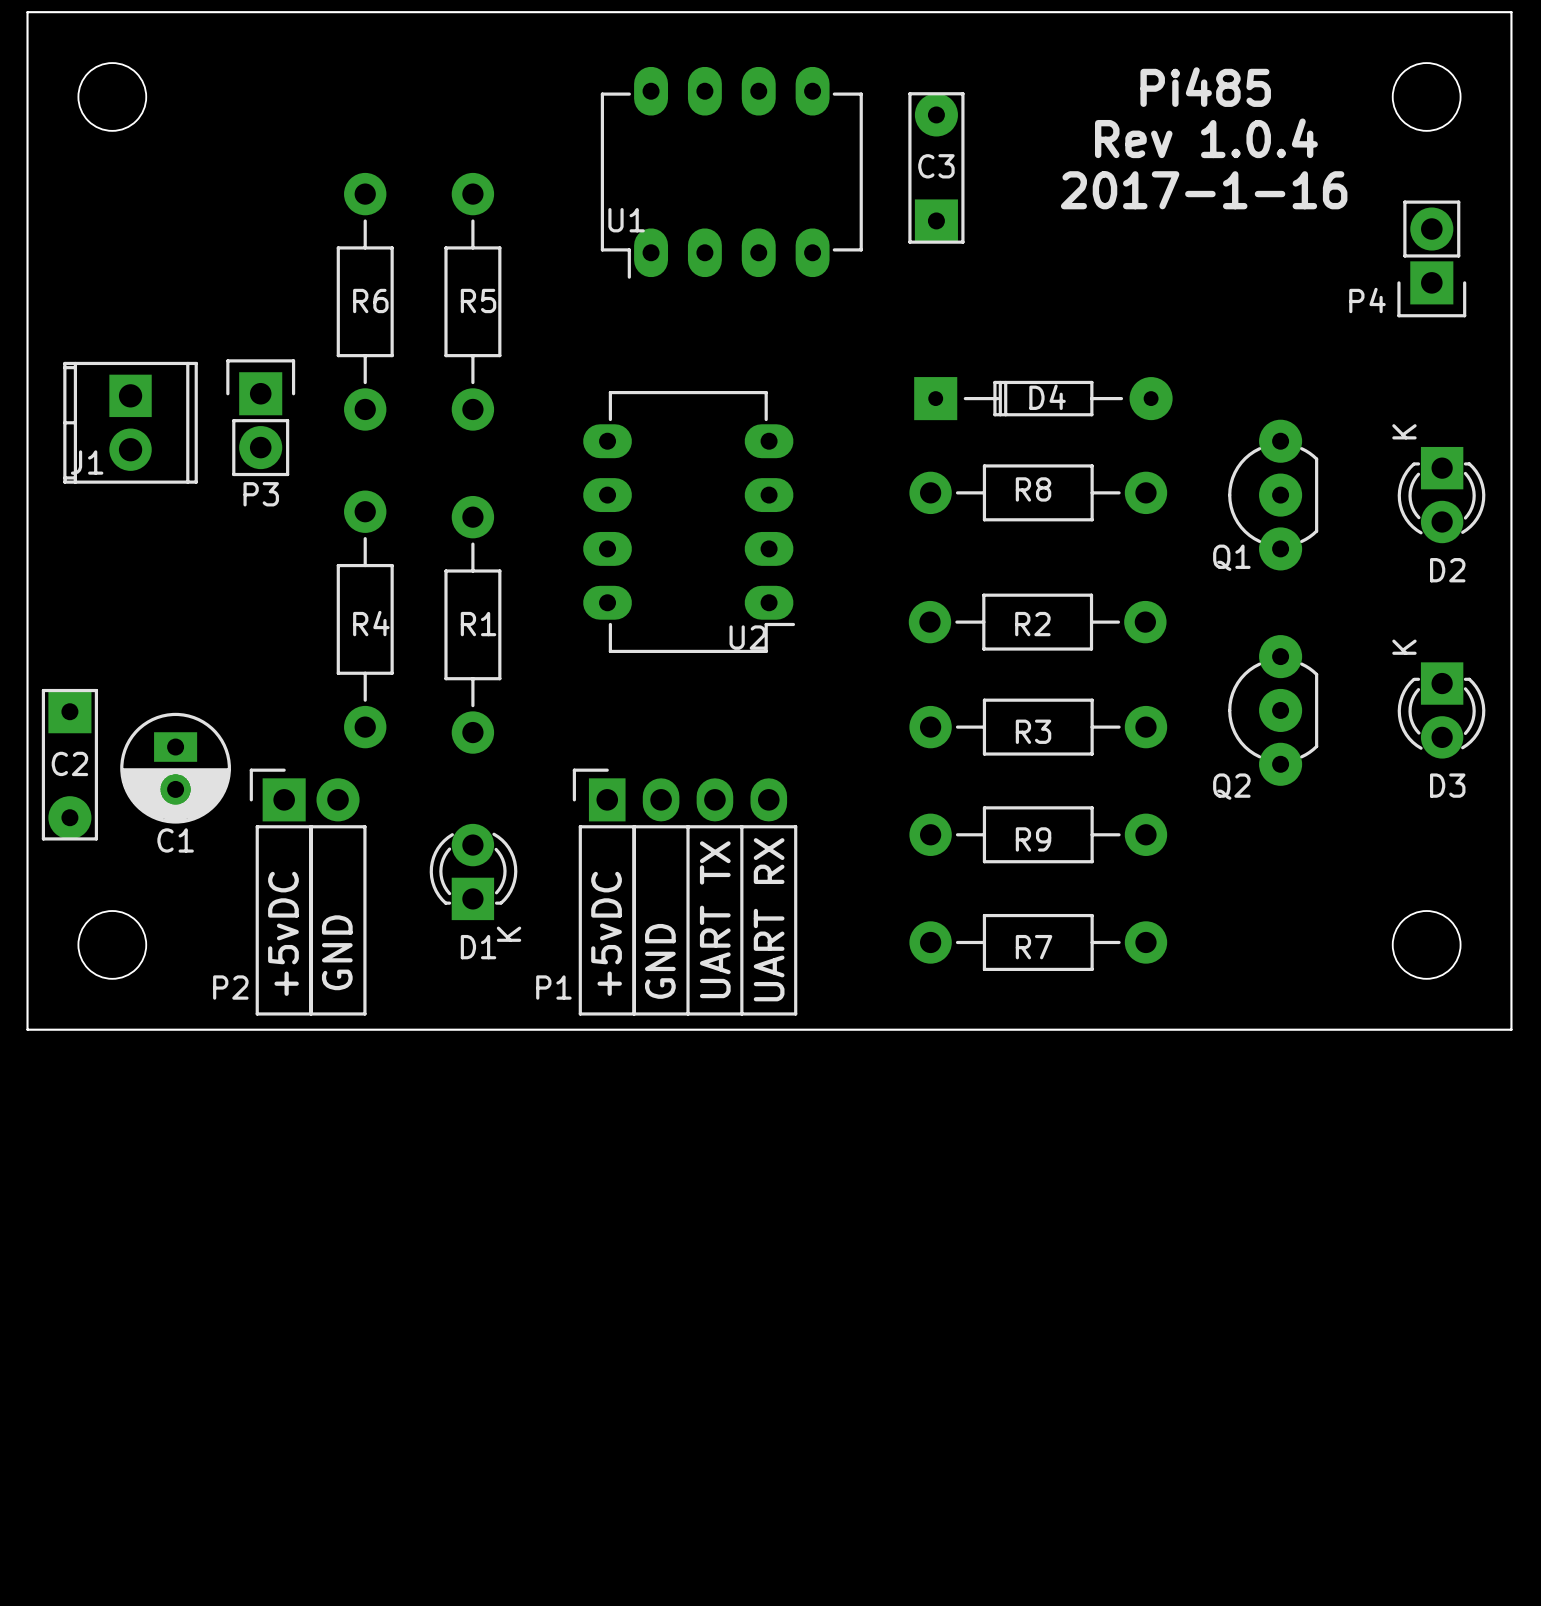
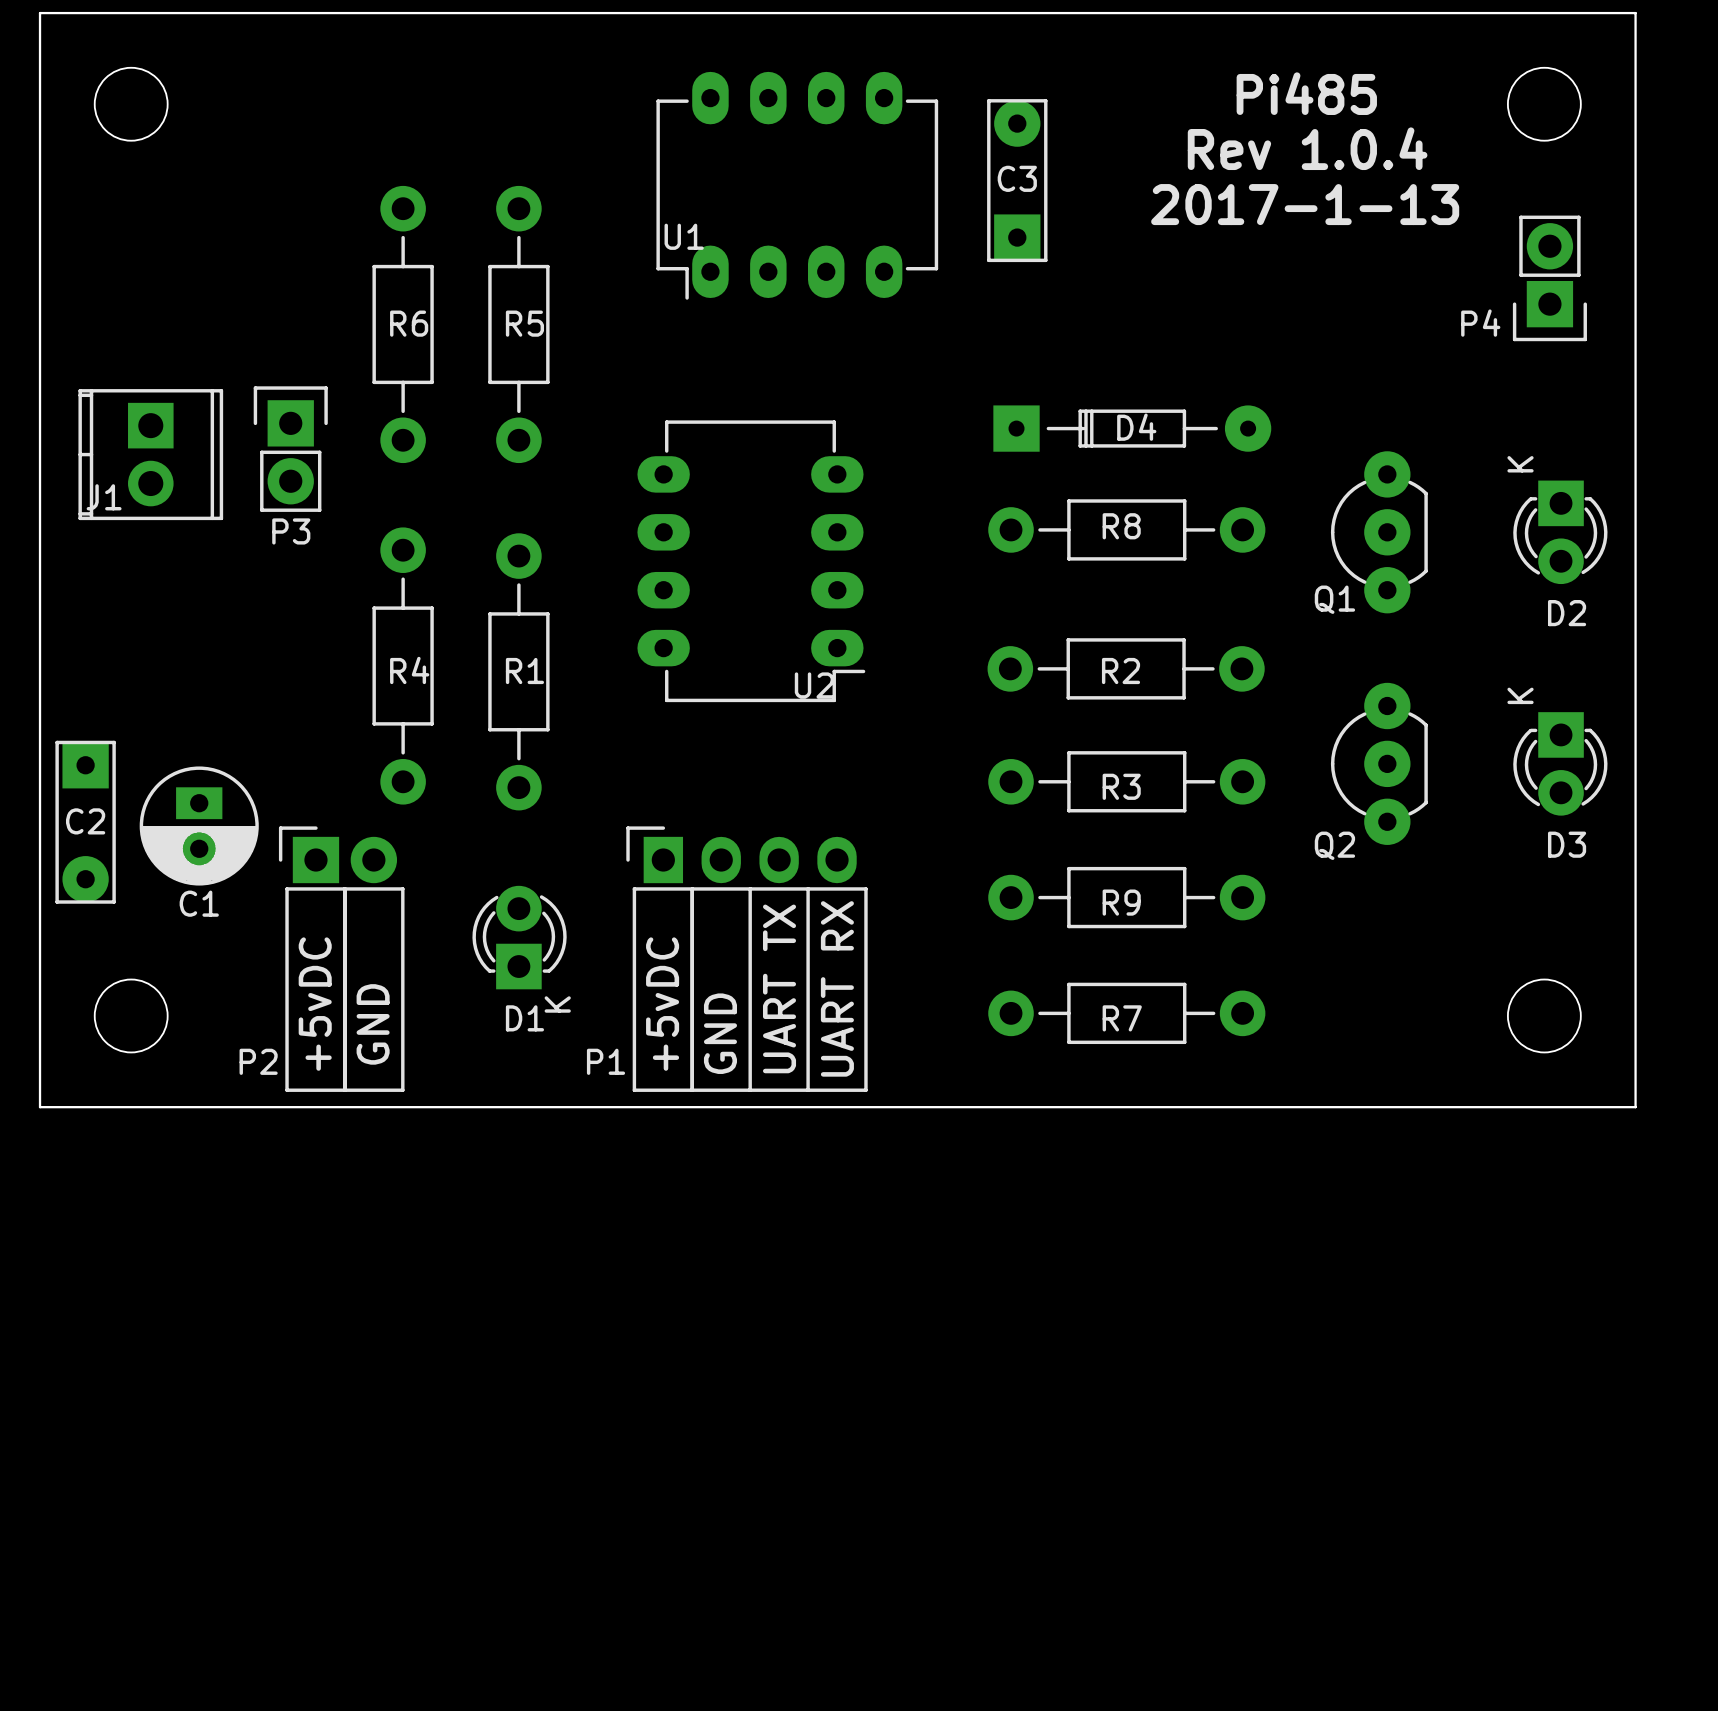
text: 2017-1-16 (1204, 190) -> 2017-1-13 (1305, 204)

